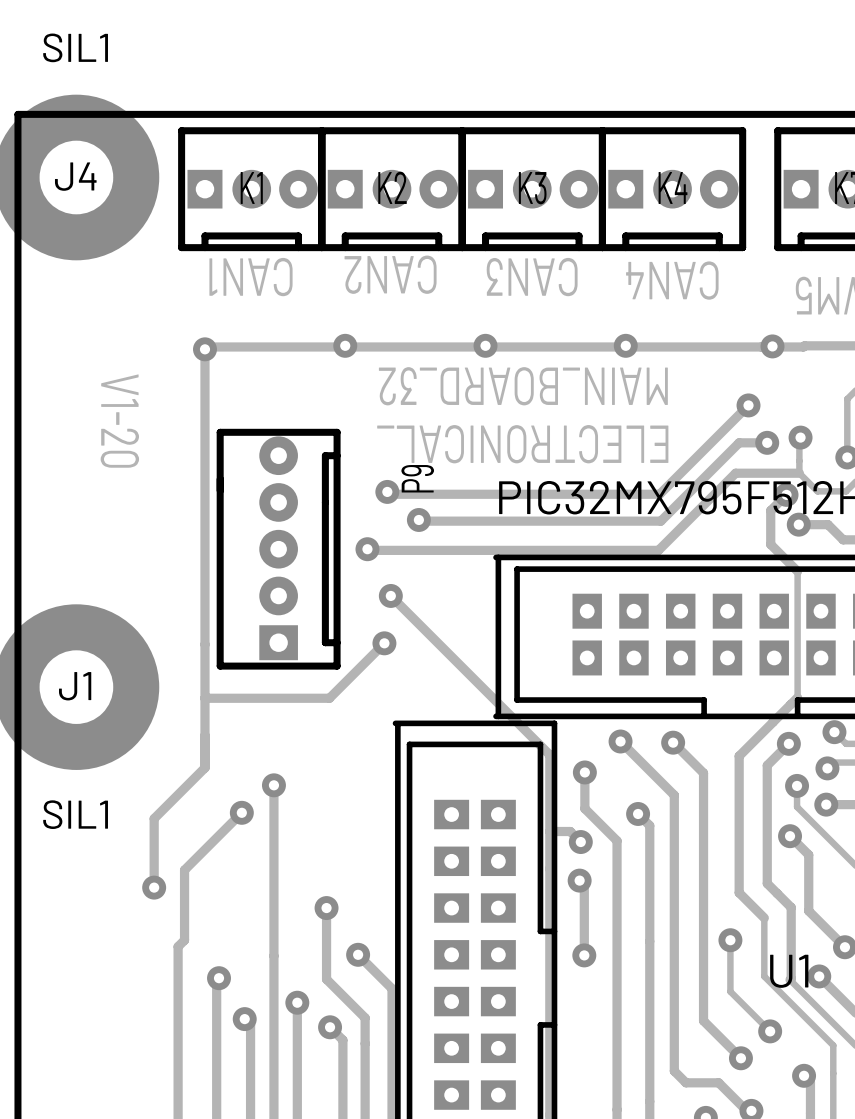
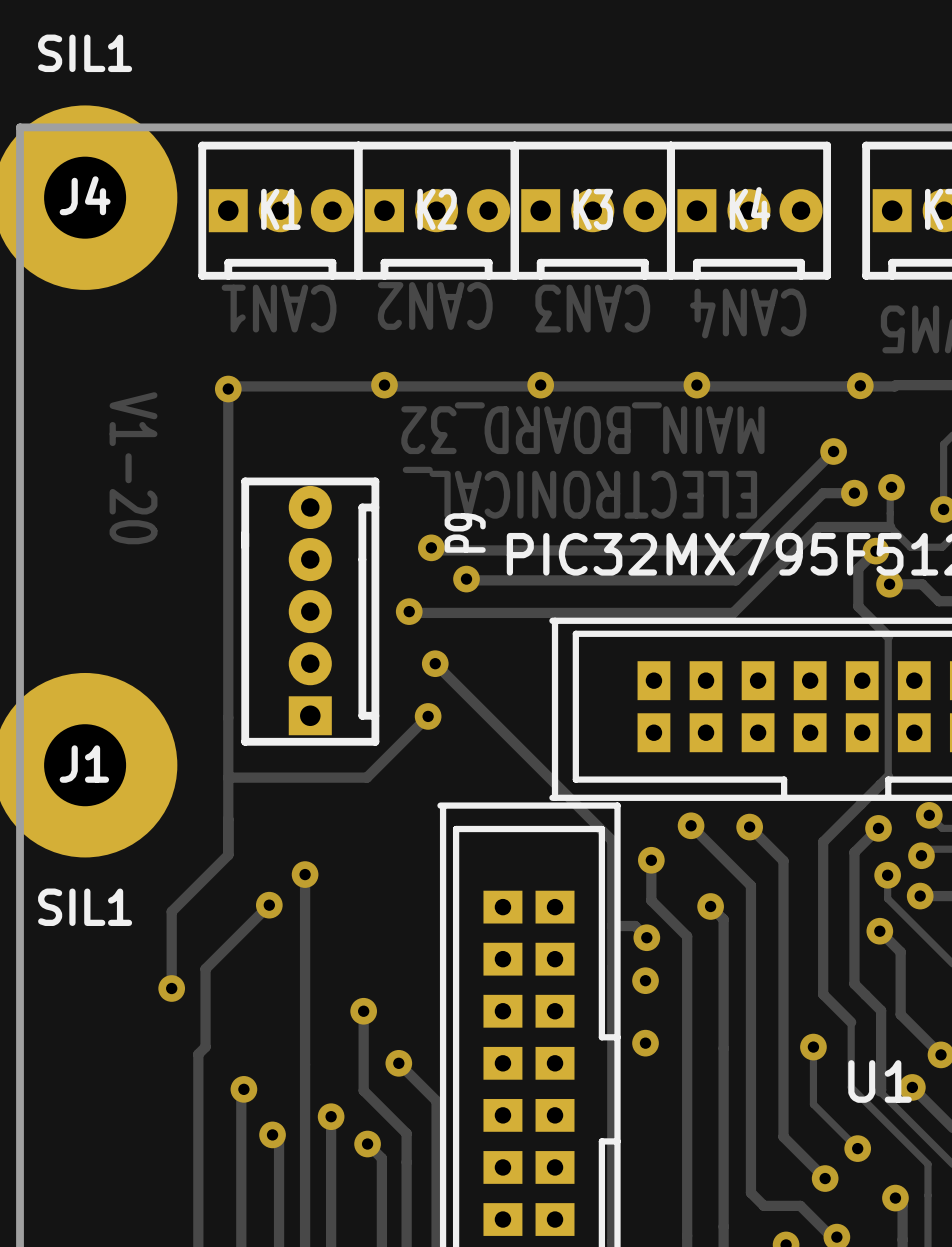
track: (579, 880) (584, 885) (584, 955) -> none
via position: (584, 955) -> (645, 1043)

